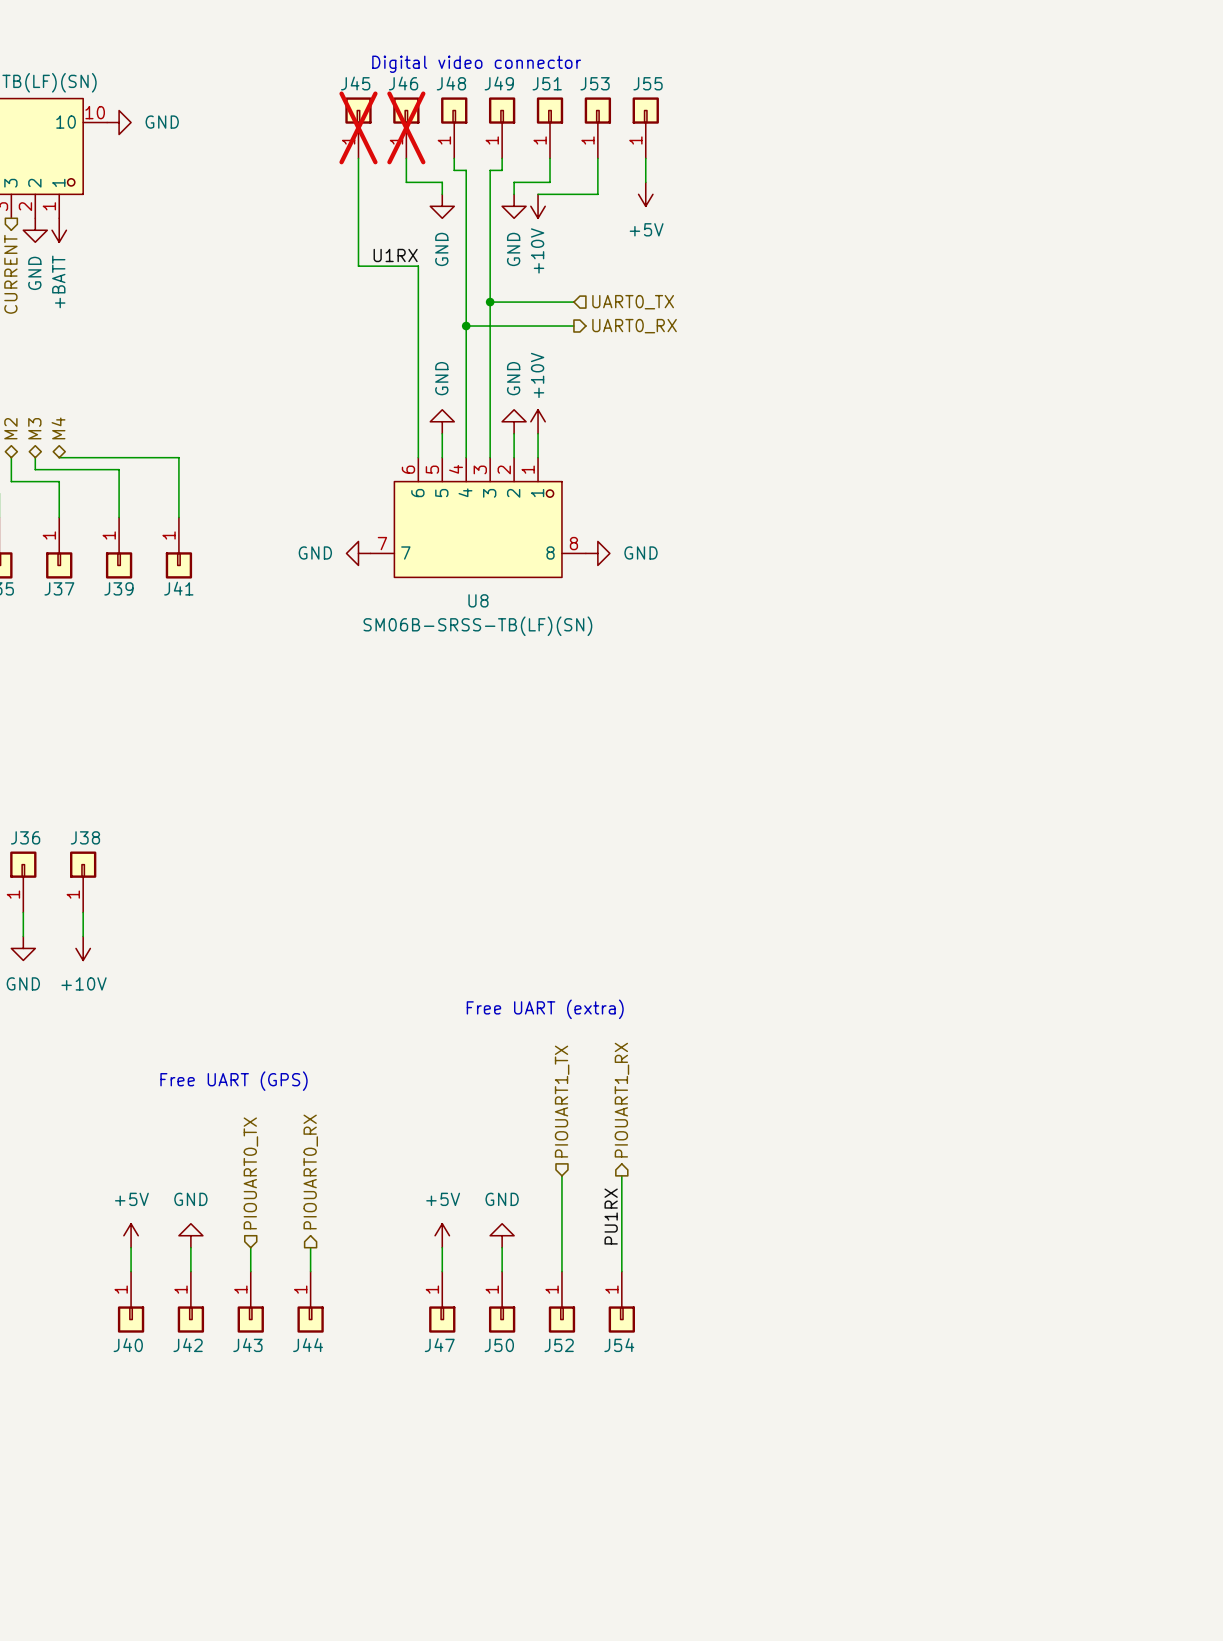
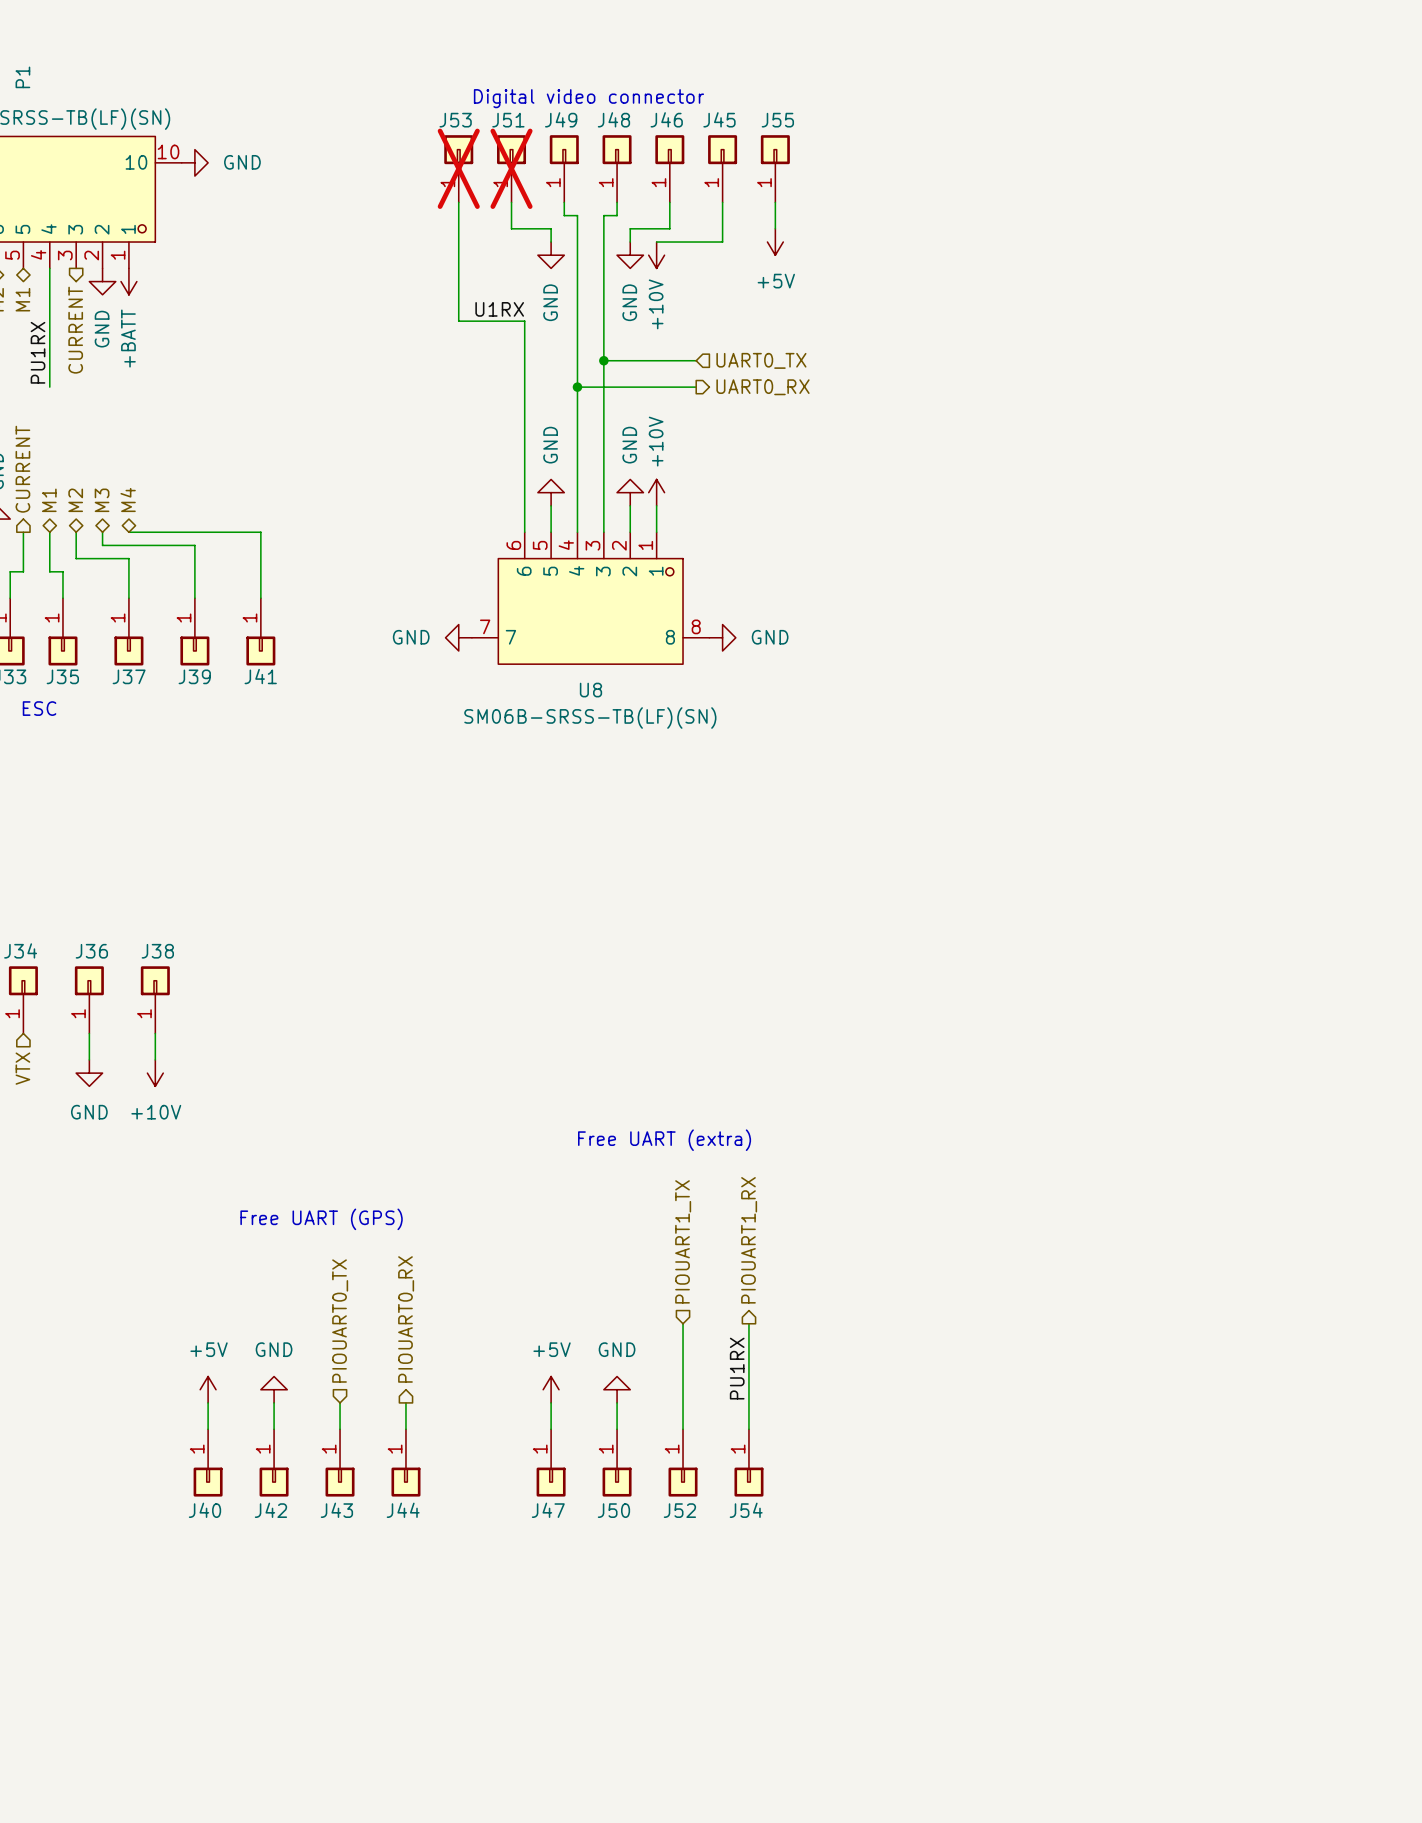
J45 name: J45 (355, 83) -> J53 (455, 120)
J46 name: J46 (403, 83) -> J51 (508, 120)
J48 name: J48 (451, 83) -> J49 (561, 119)
J49 name: J49 (499, 83) -> J48 (613, 119)
J51 name: J51 (547, 83) -> J46 (666, 119)
J53 name: J53 (595, 83) -> J45 (719, 119)

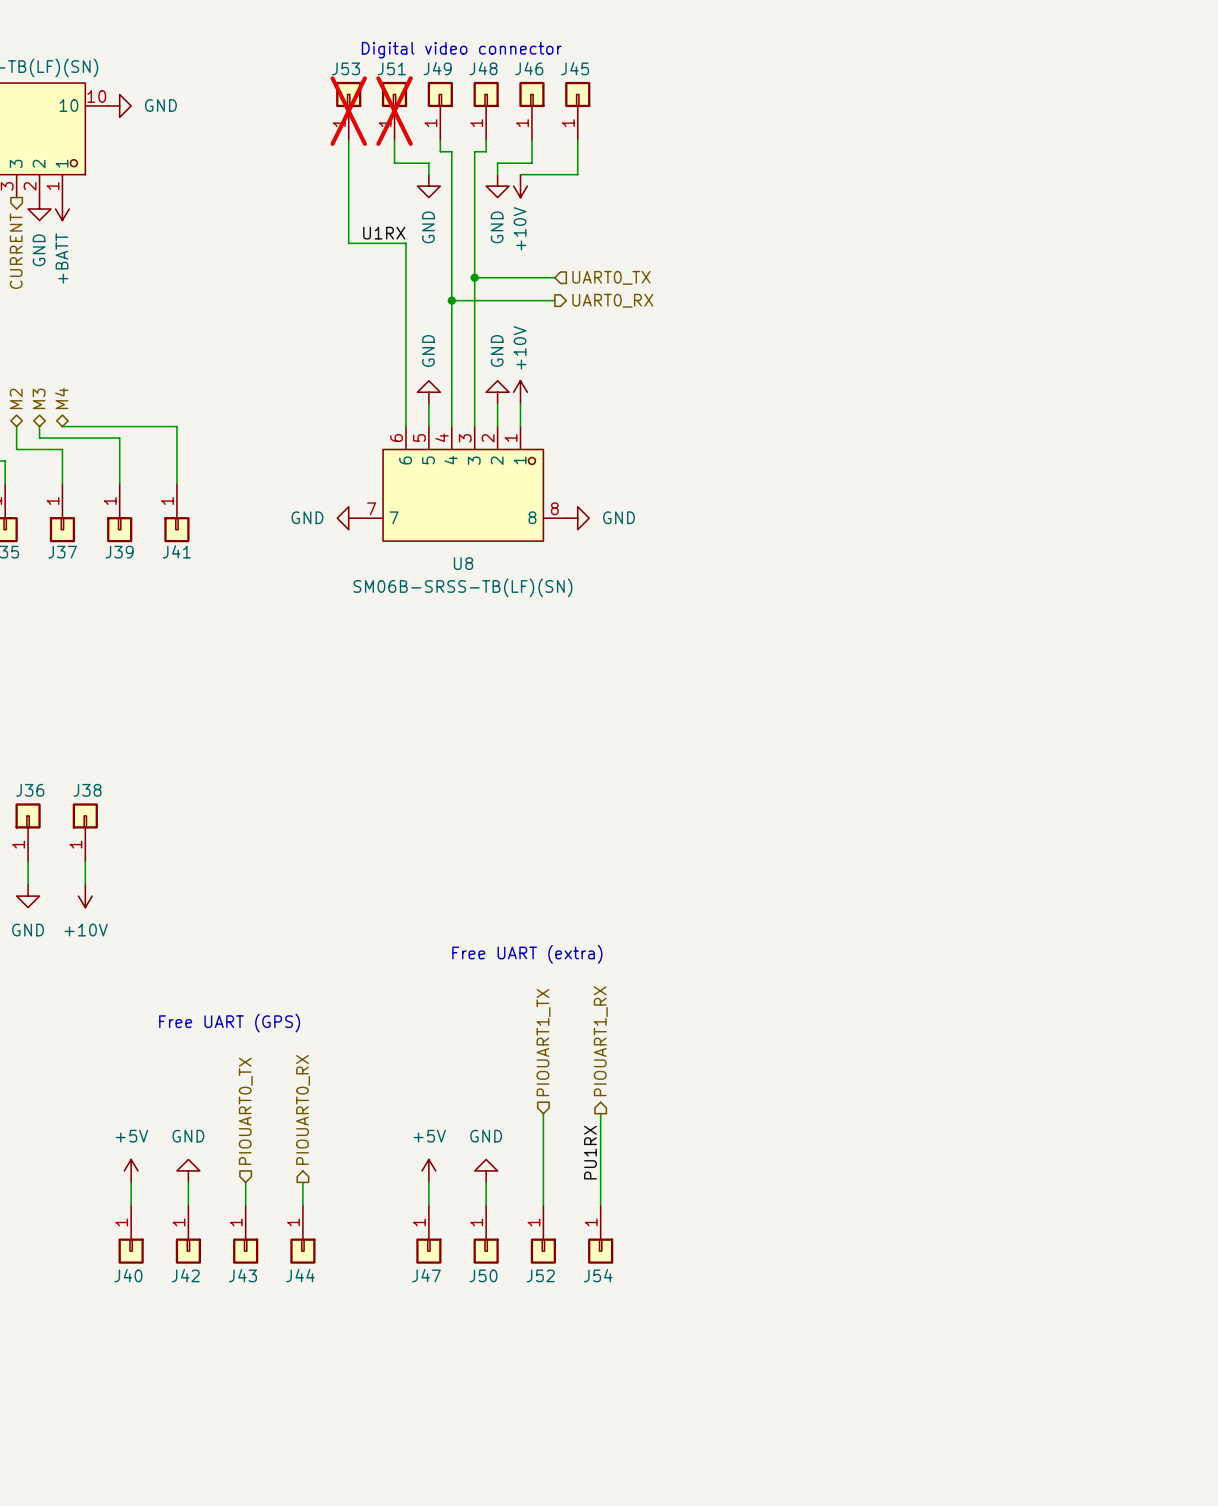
J55: (775, 168) -> none
wire: (775, 202) (775, 228) -> none
power symbol: +5V (775, 242) -> none

